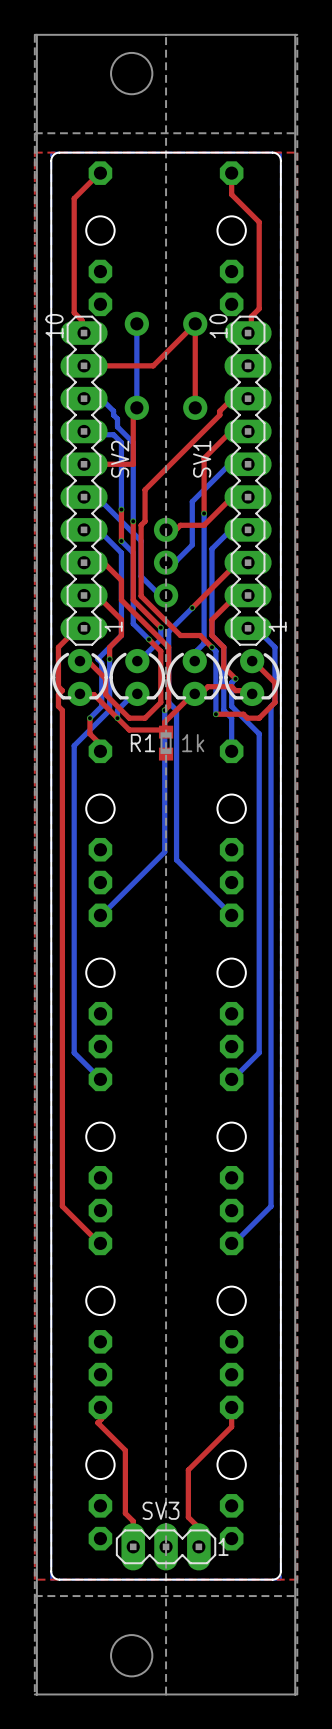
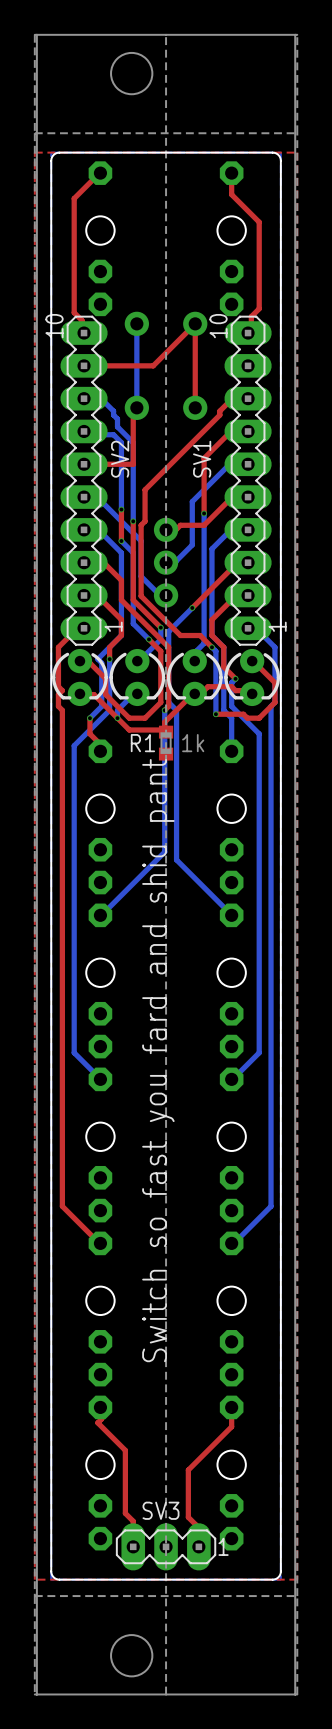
text: none -> Switch so fast you fard and shid pant (158, 1060)

